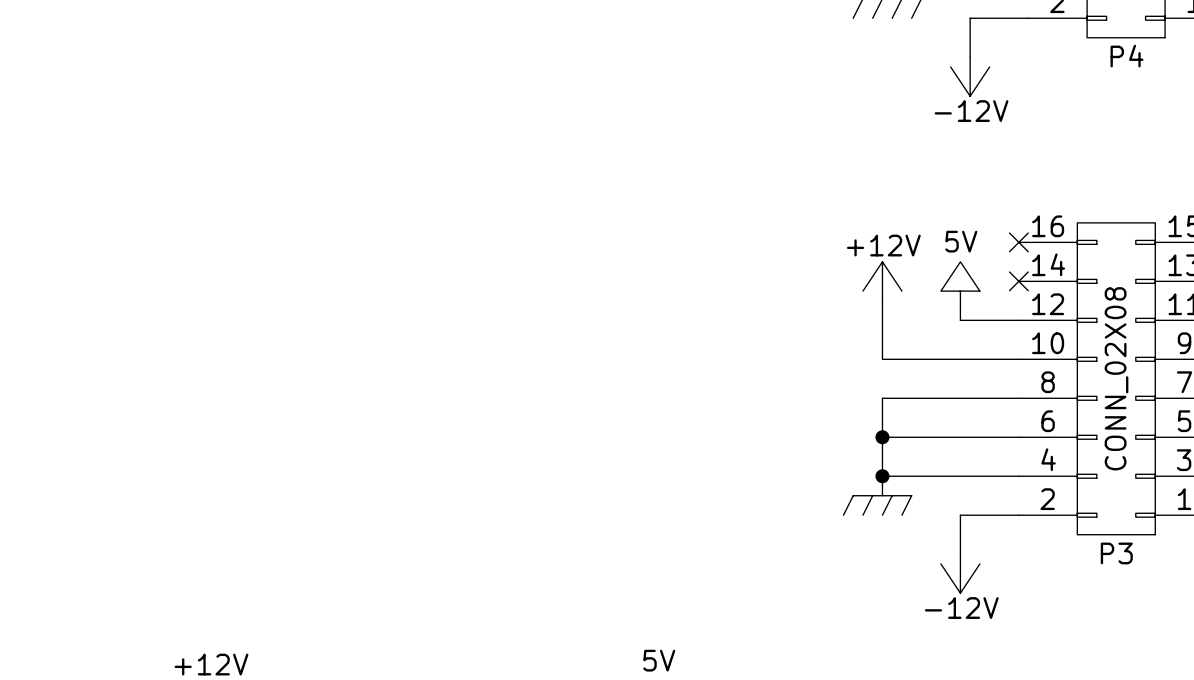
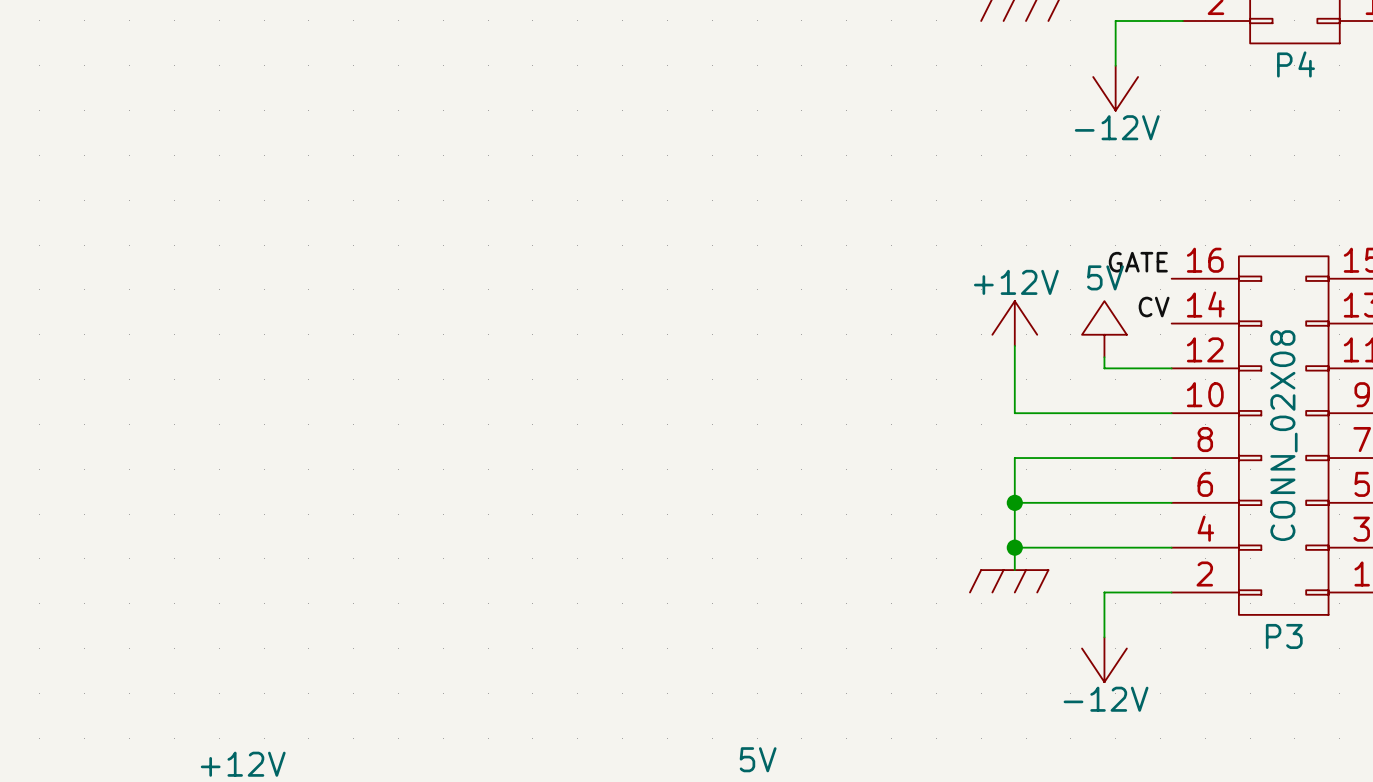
label: none -> GATE (1138, 262)
no-connect mark: (1018, 242) -> none
label: none -> CV (1154, 307)
no-connect mark: (1018, 281) -> none

